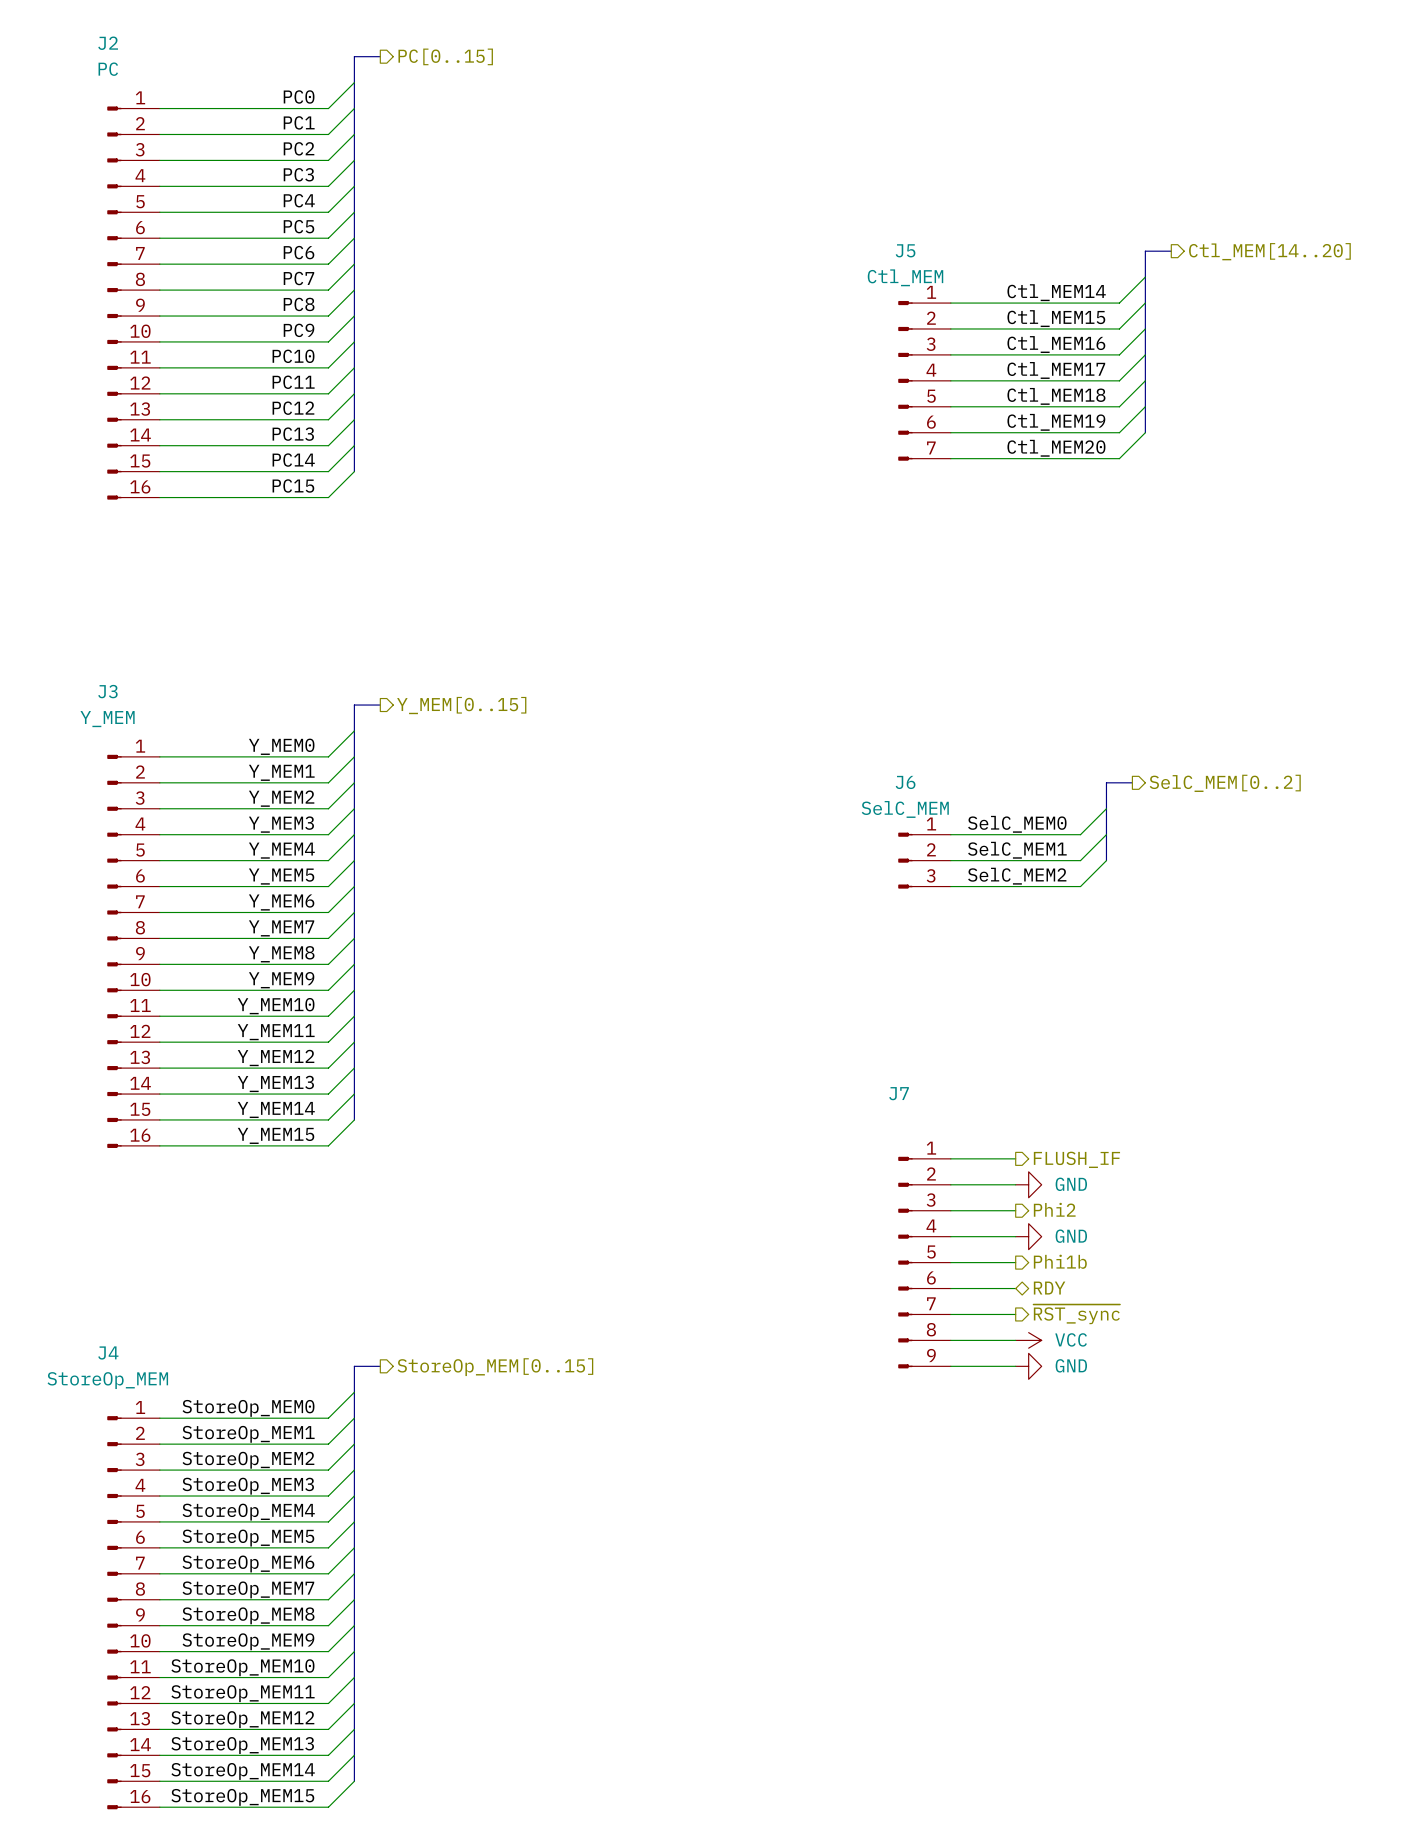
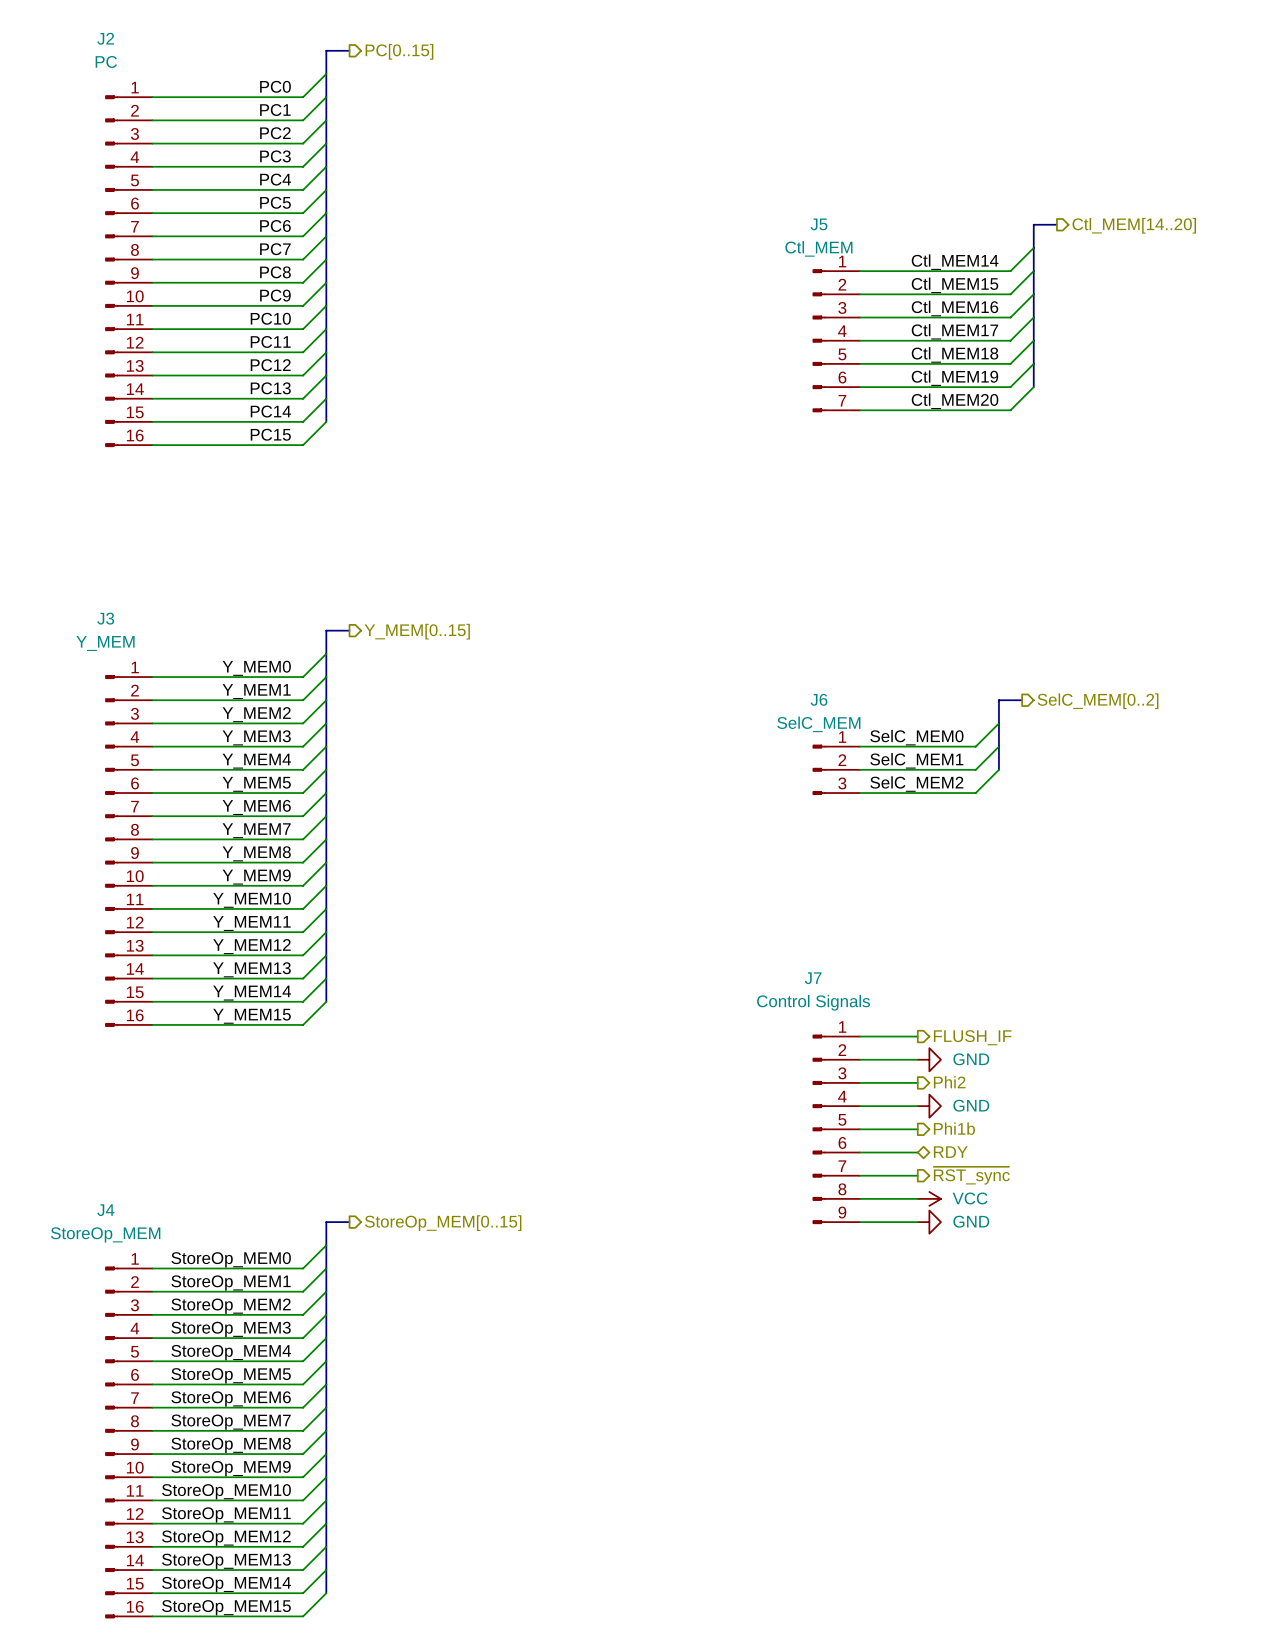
J7 value: none -> Control Signals (813, 1002)

